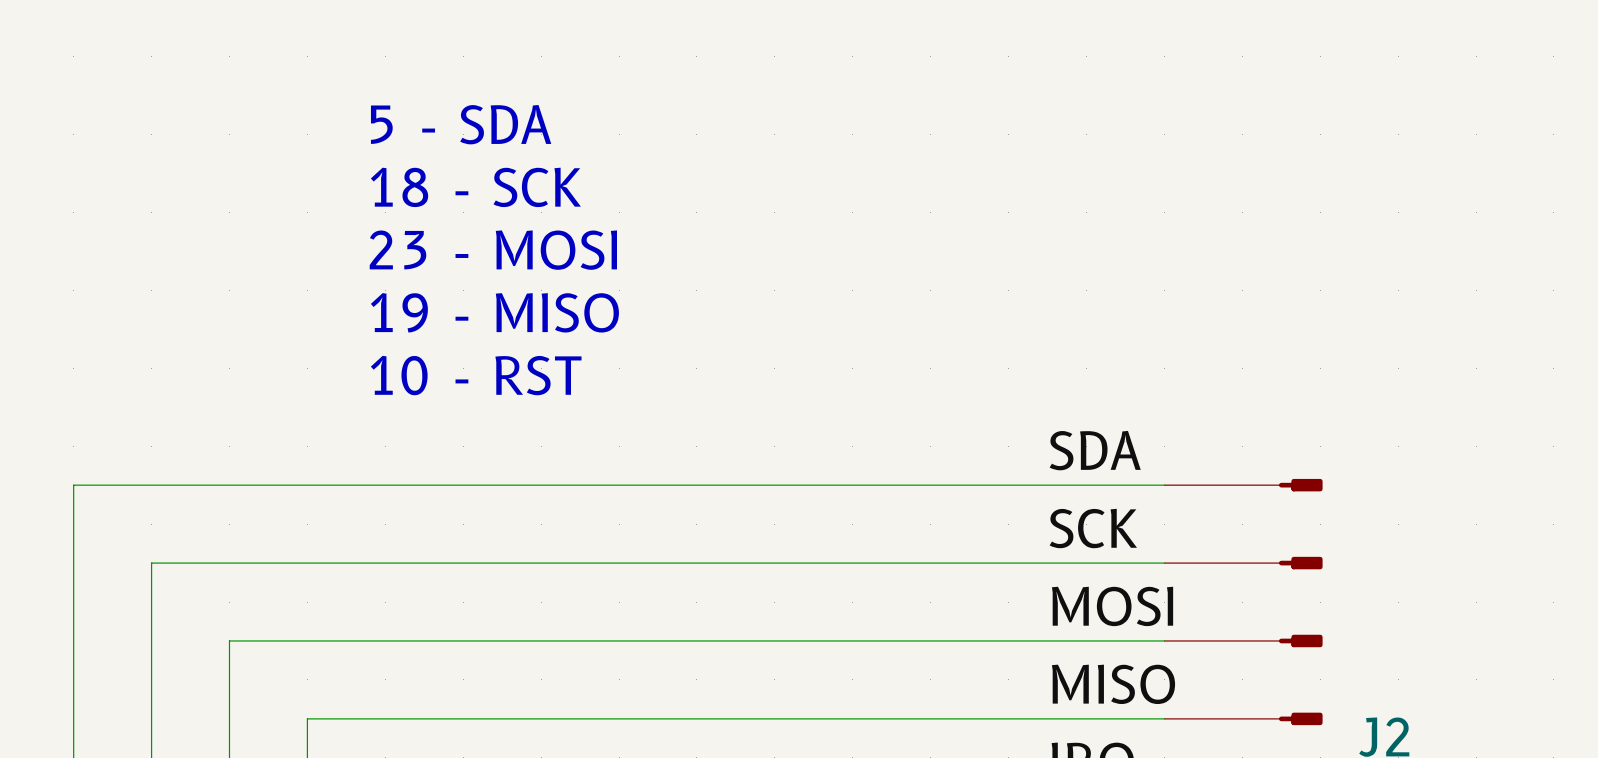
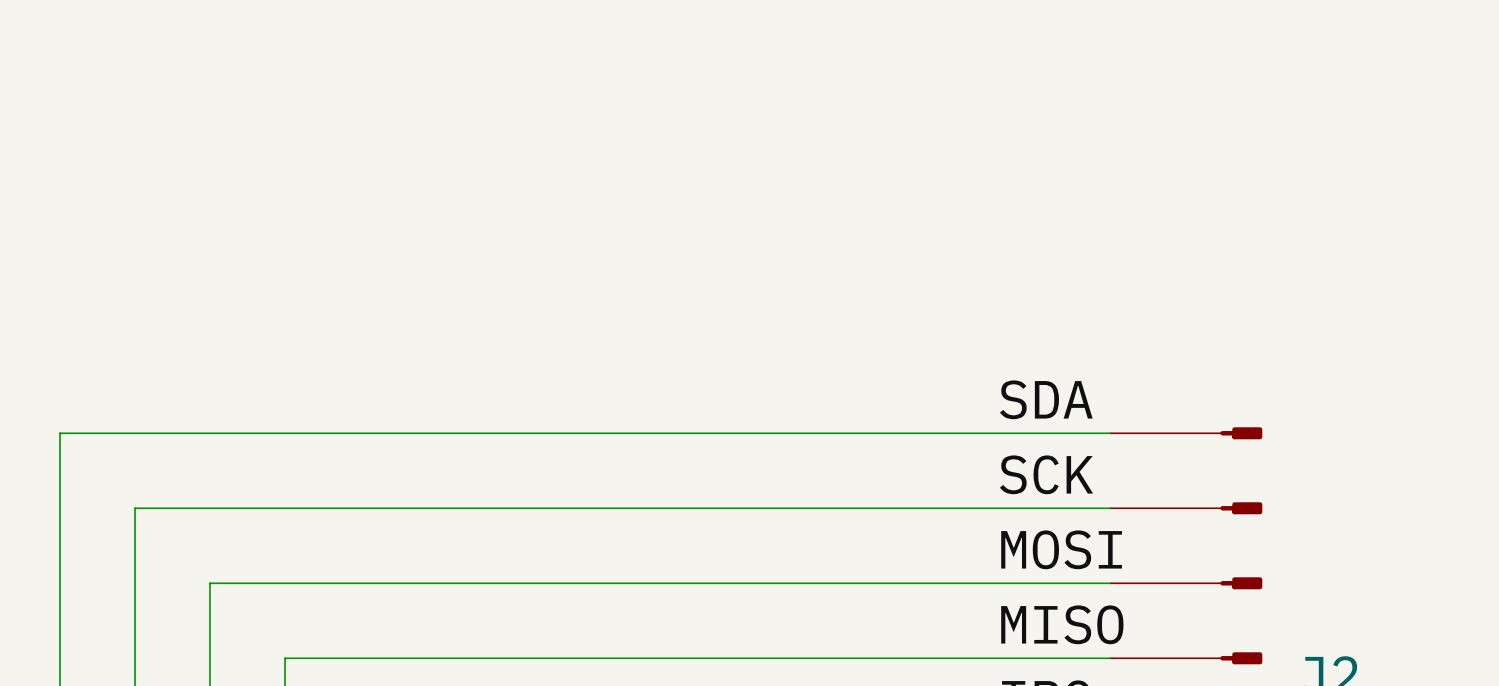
text: 5 - SDA (461, 124) -> none
text: 18 - SCK (475, 187) -> none
text: 23 - MOSI (493, 250) -> none
text: 19 - MISO (494, 312) -> none
text: 10 - RST (476, 375) -> none

